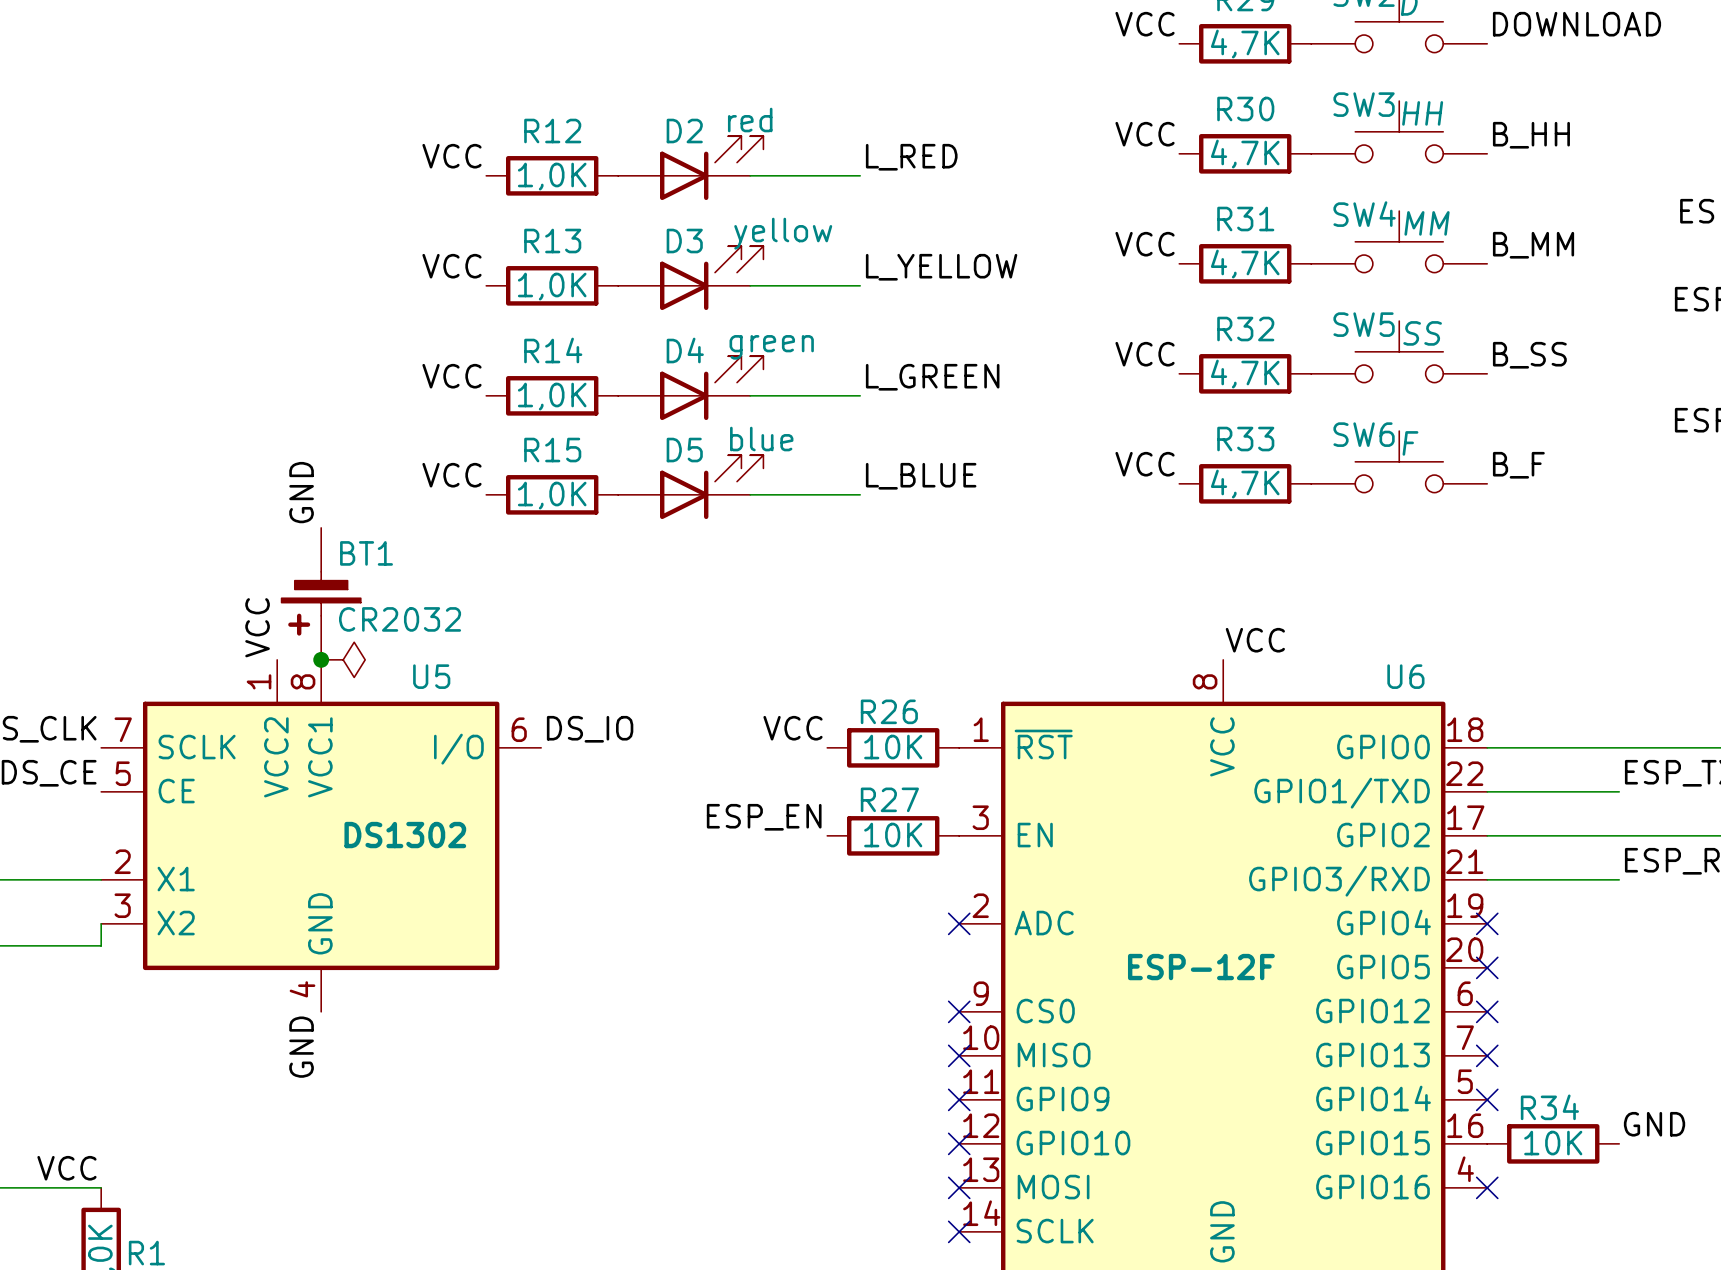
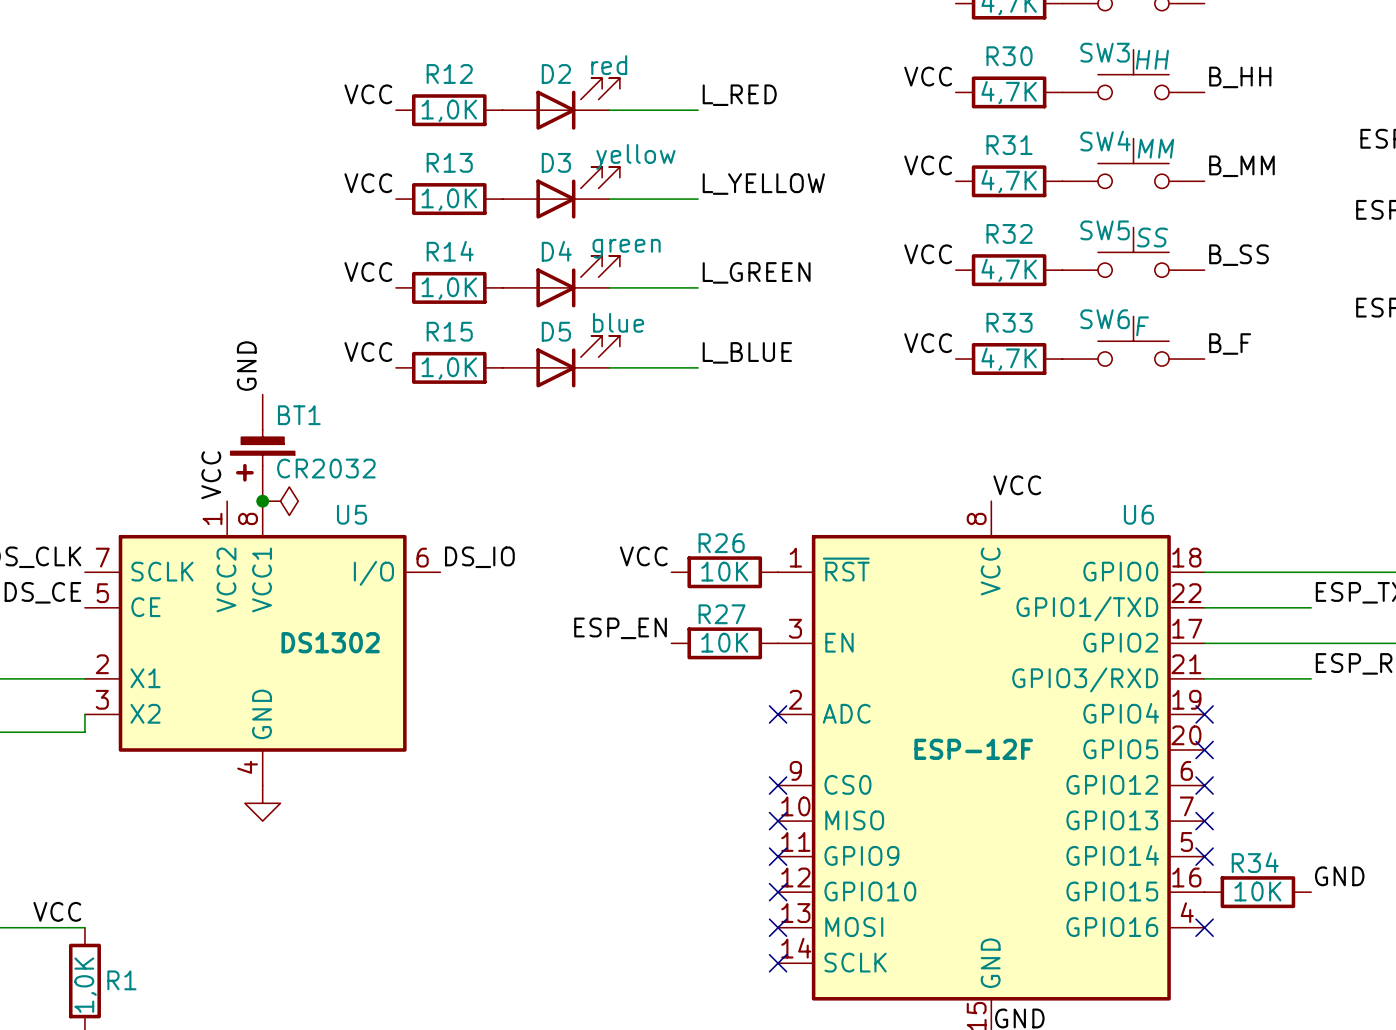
power symbol: none -> (262, 803)
label: GND (301, 1047) -> none

